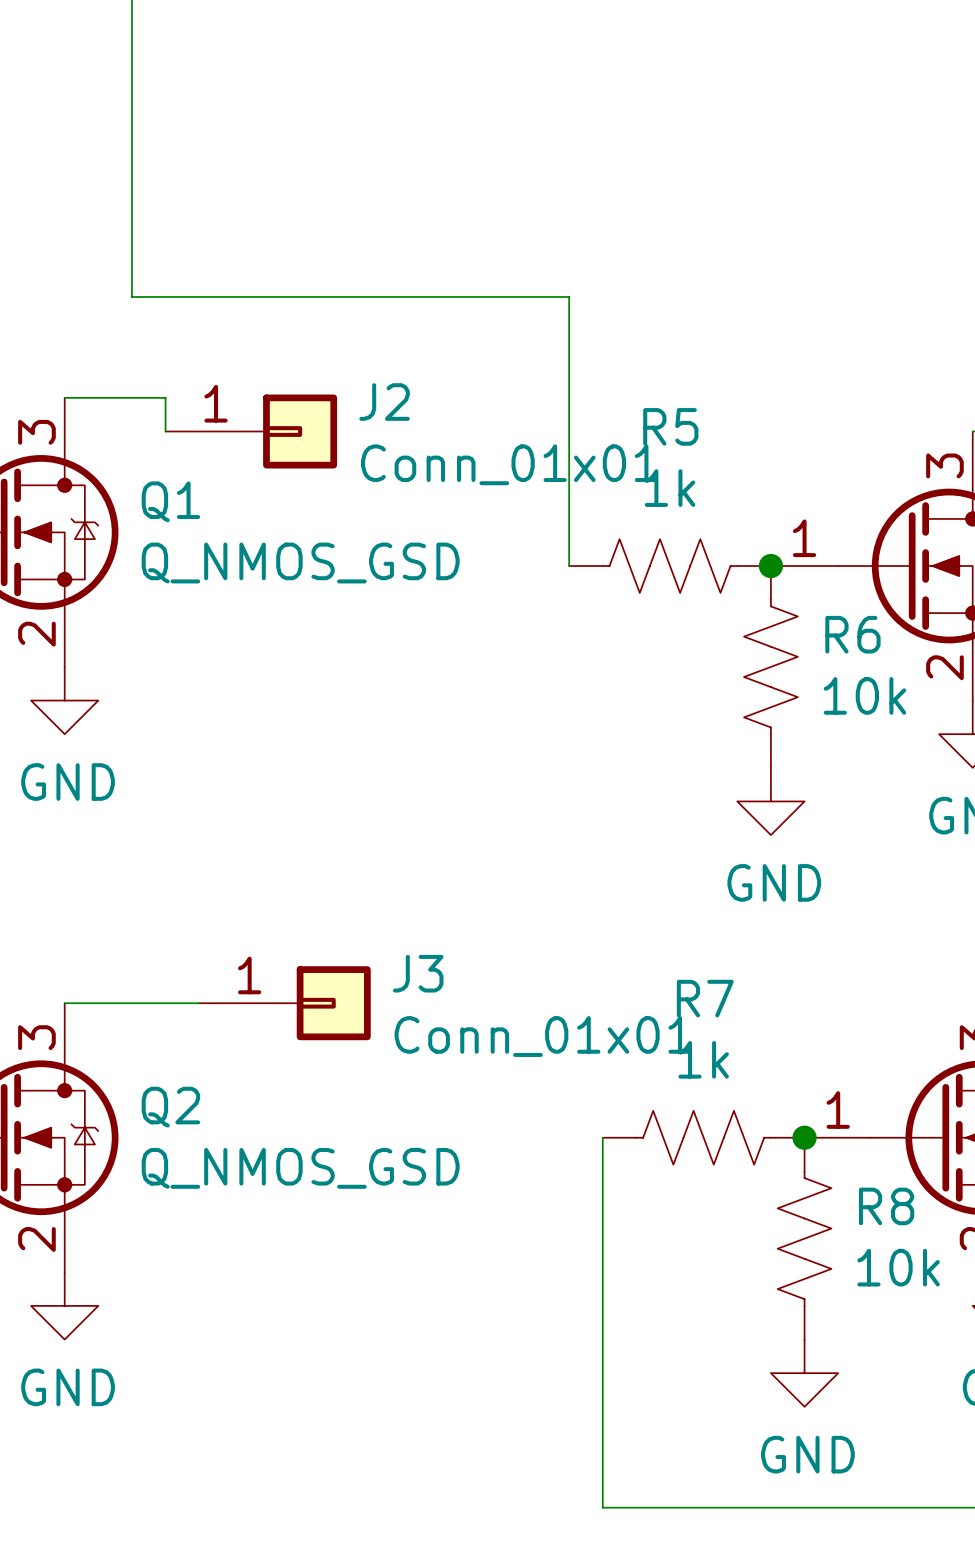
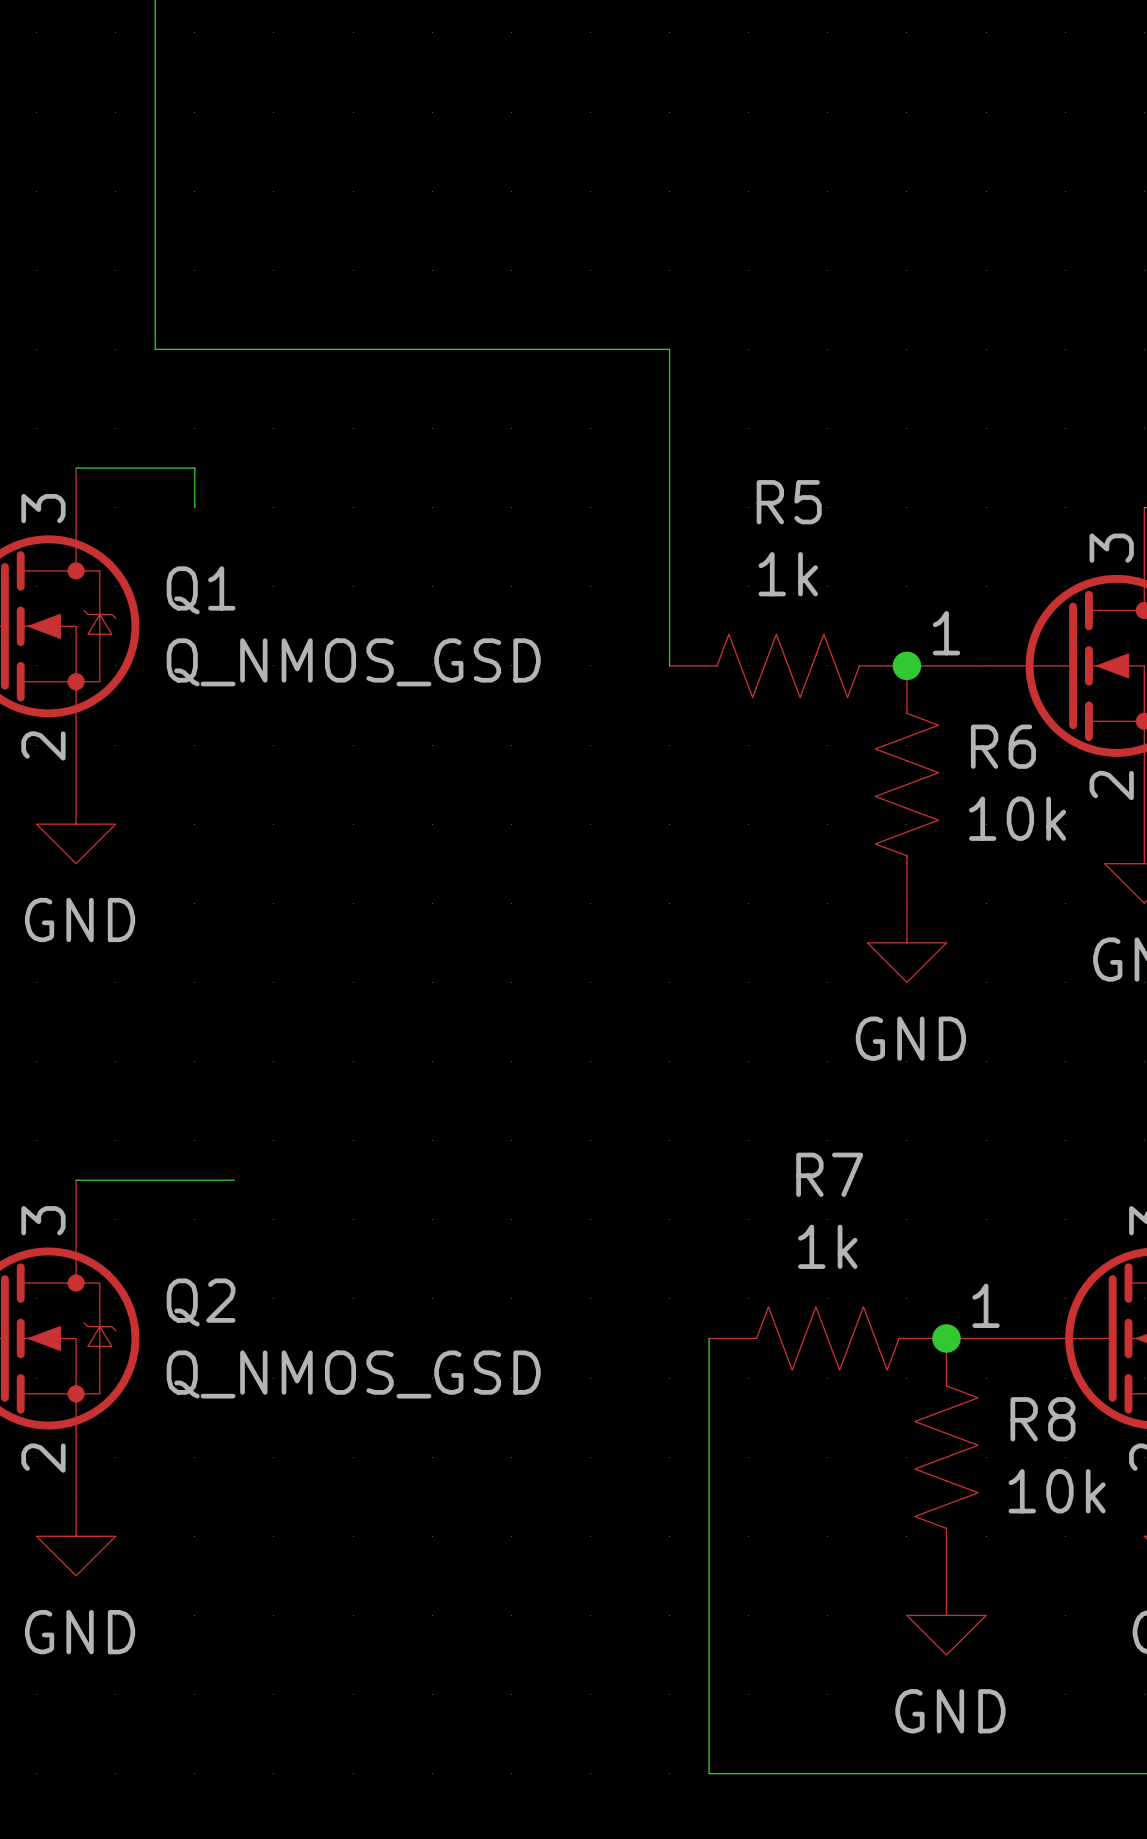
J2: Conn_01x01 (251, 431) -> none
J3: Conn_01x01 (284, 1003) -> none

